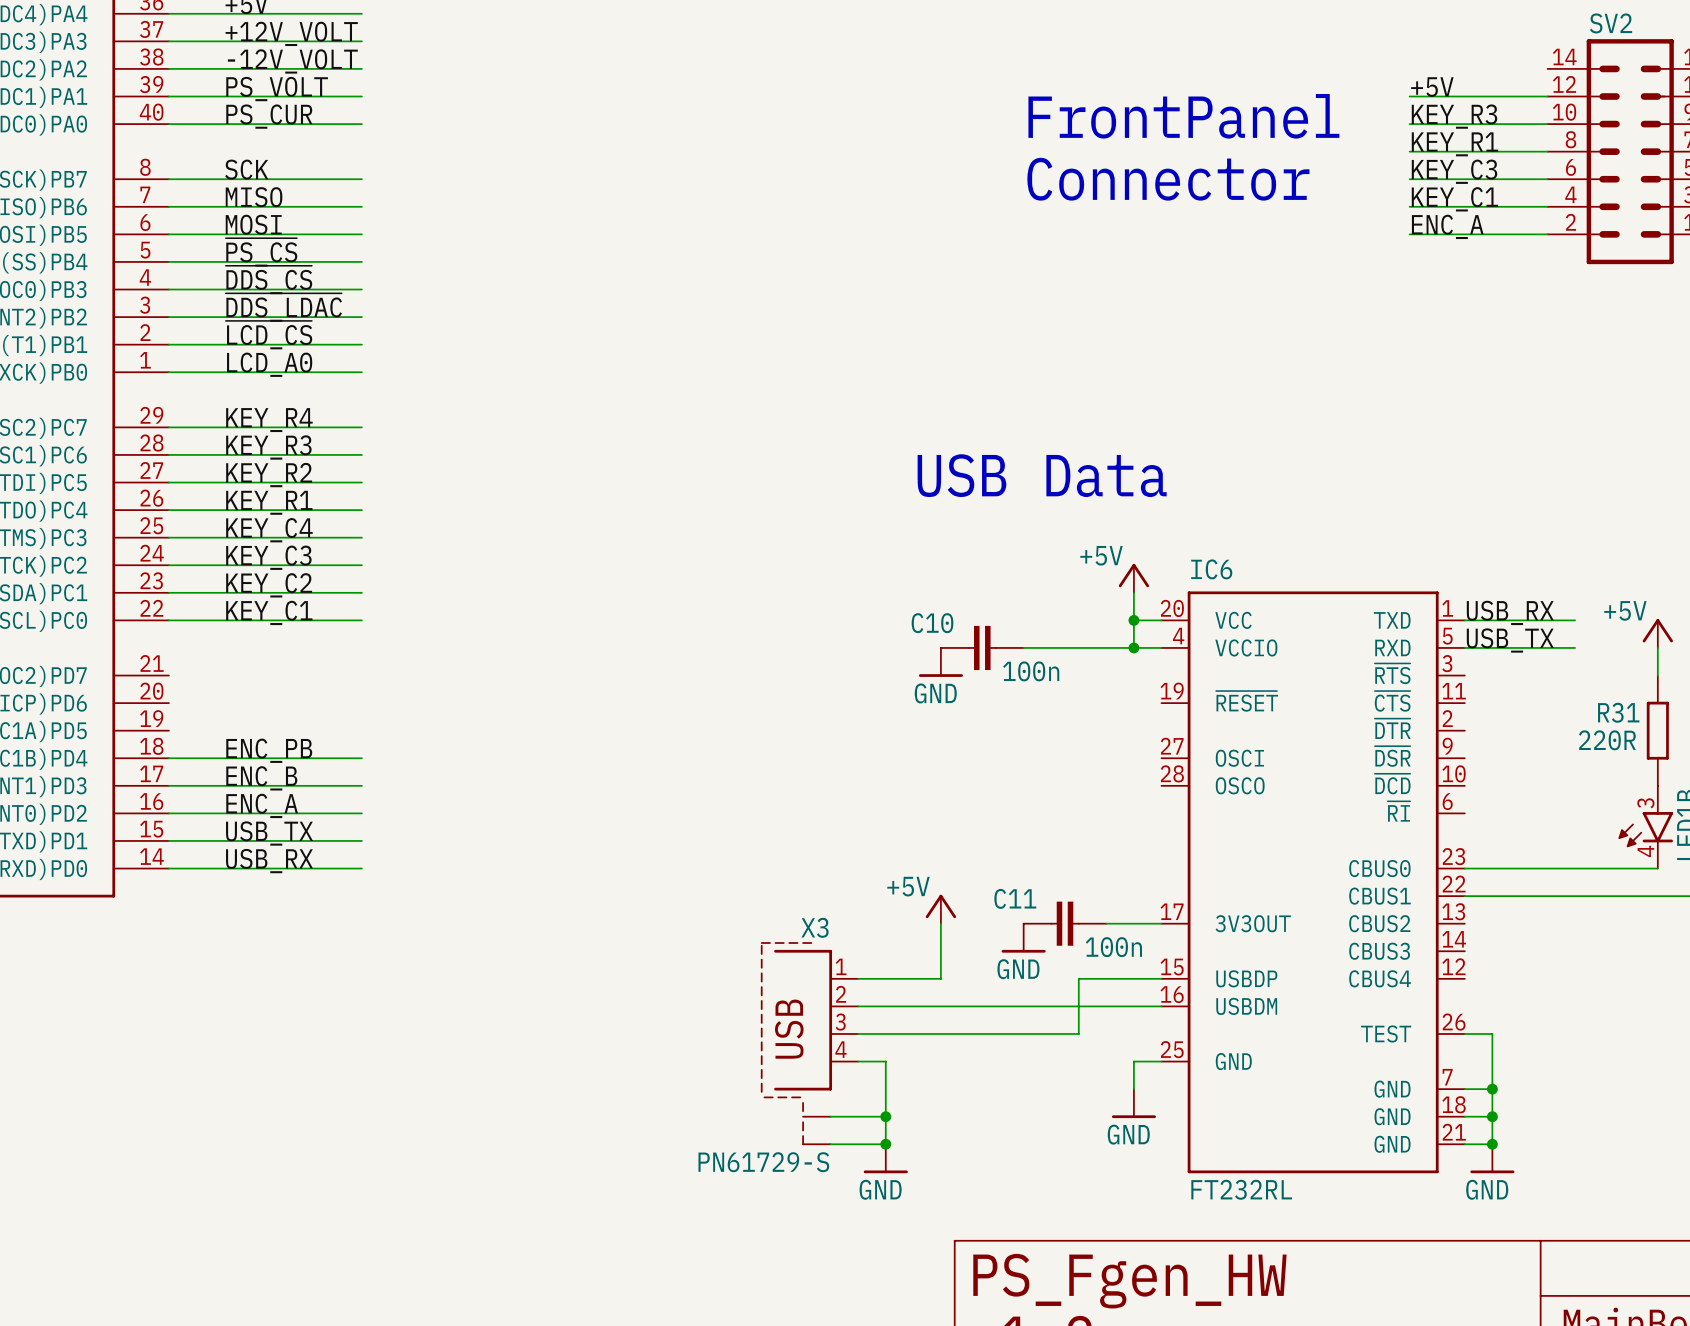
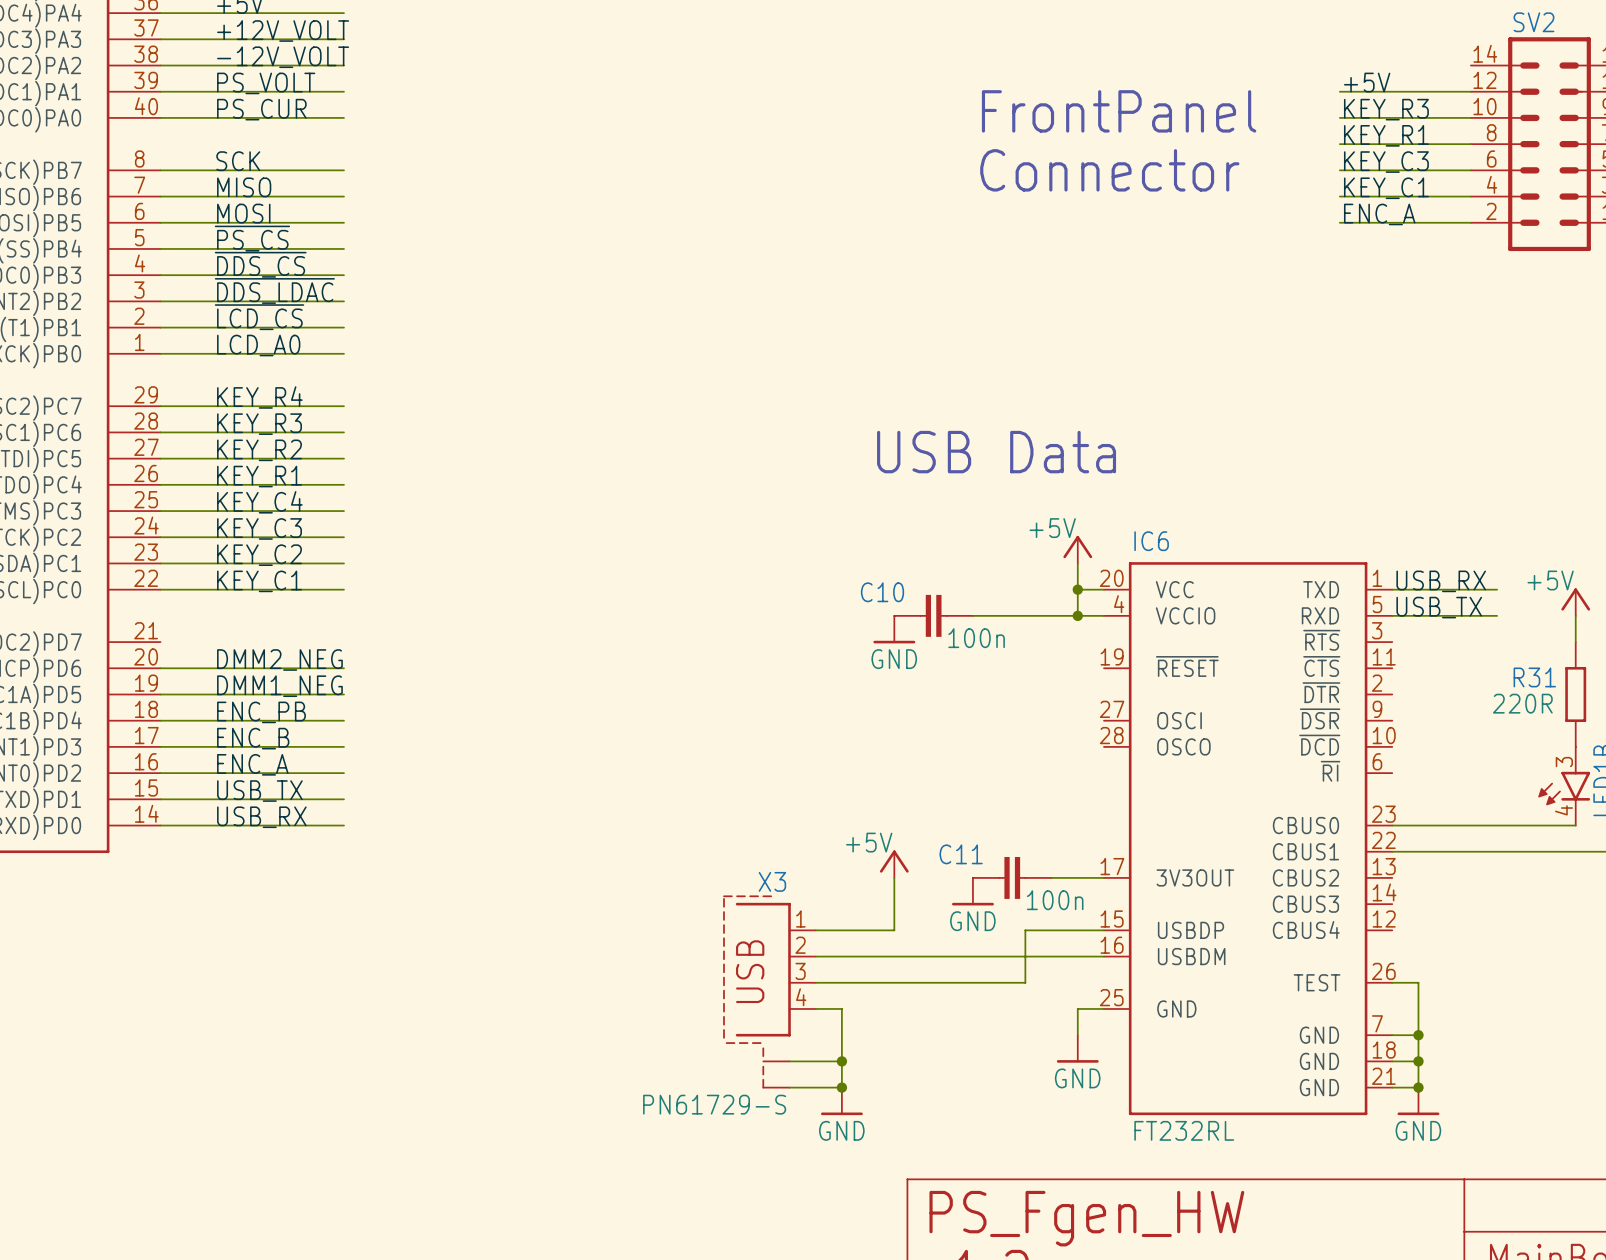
label: none -> DMM2_NEG (279, 659)
wire: none -> (160, 668) (343, 668)
label: none -> DMM1_NEG (279, 686)
wire: none -> (160, 694) (343, 694)

